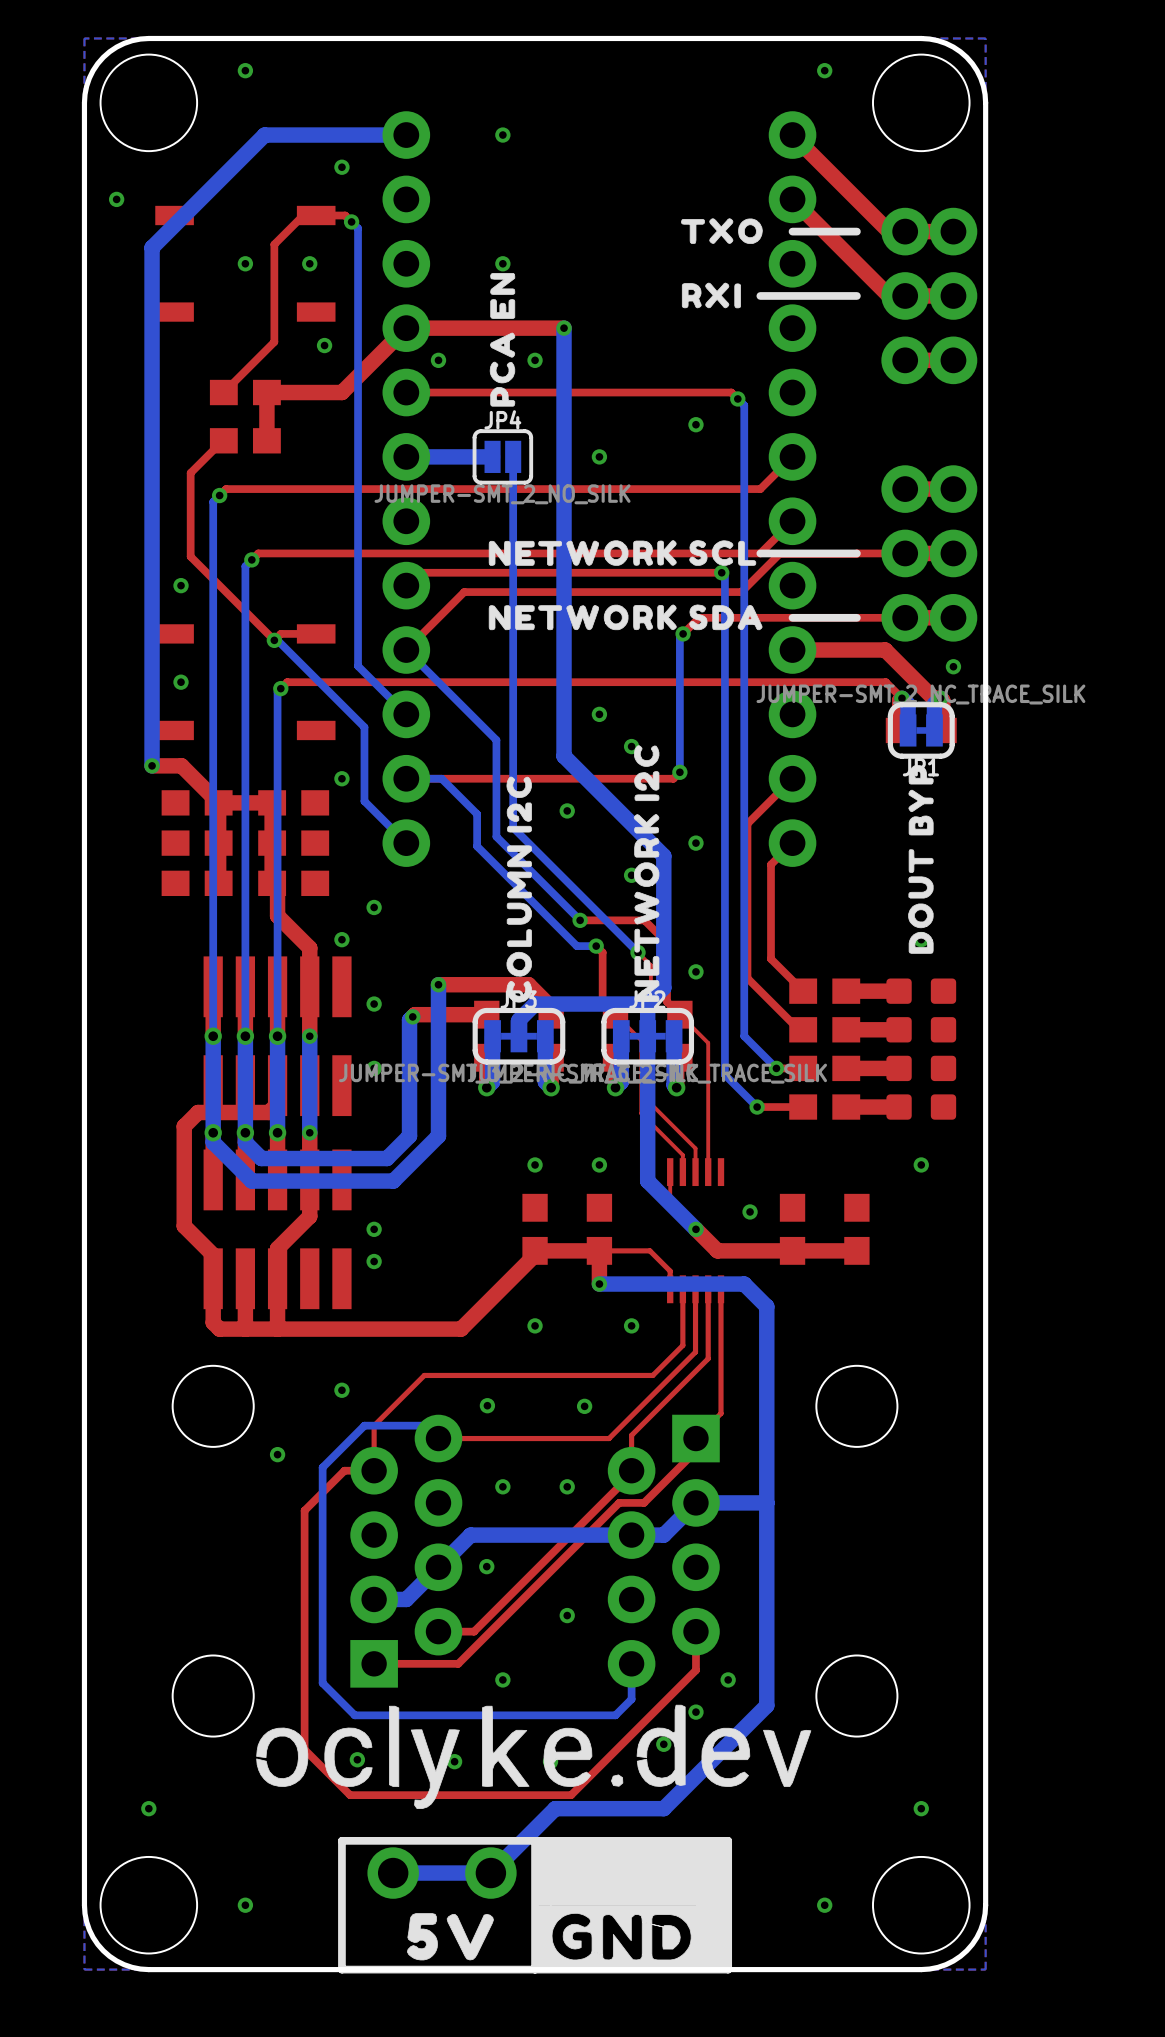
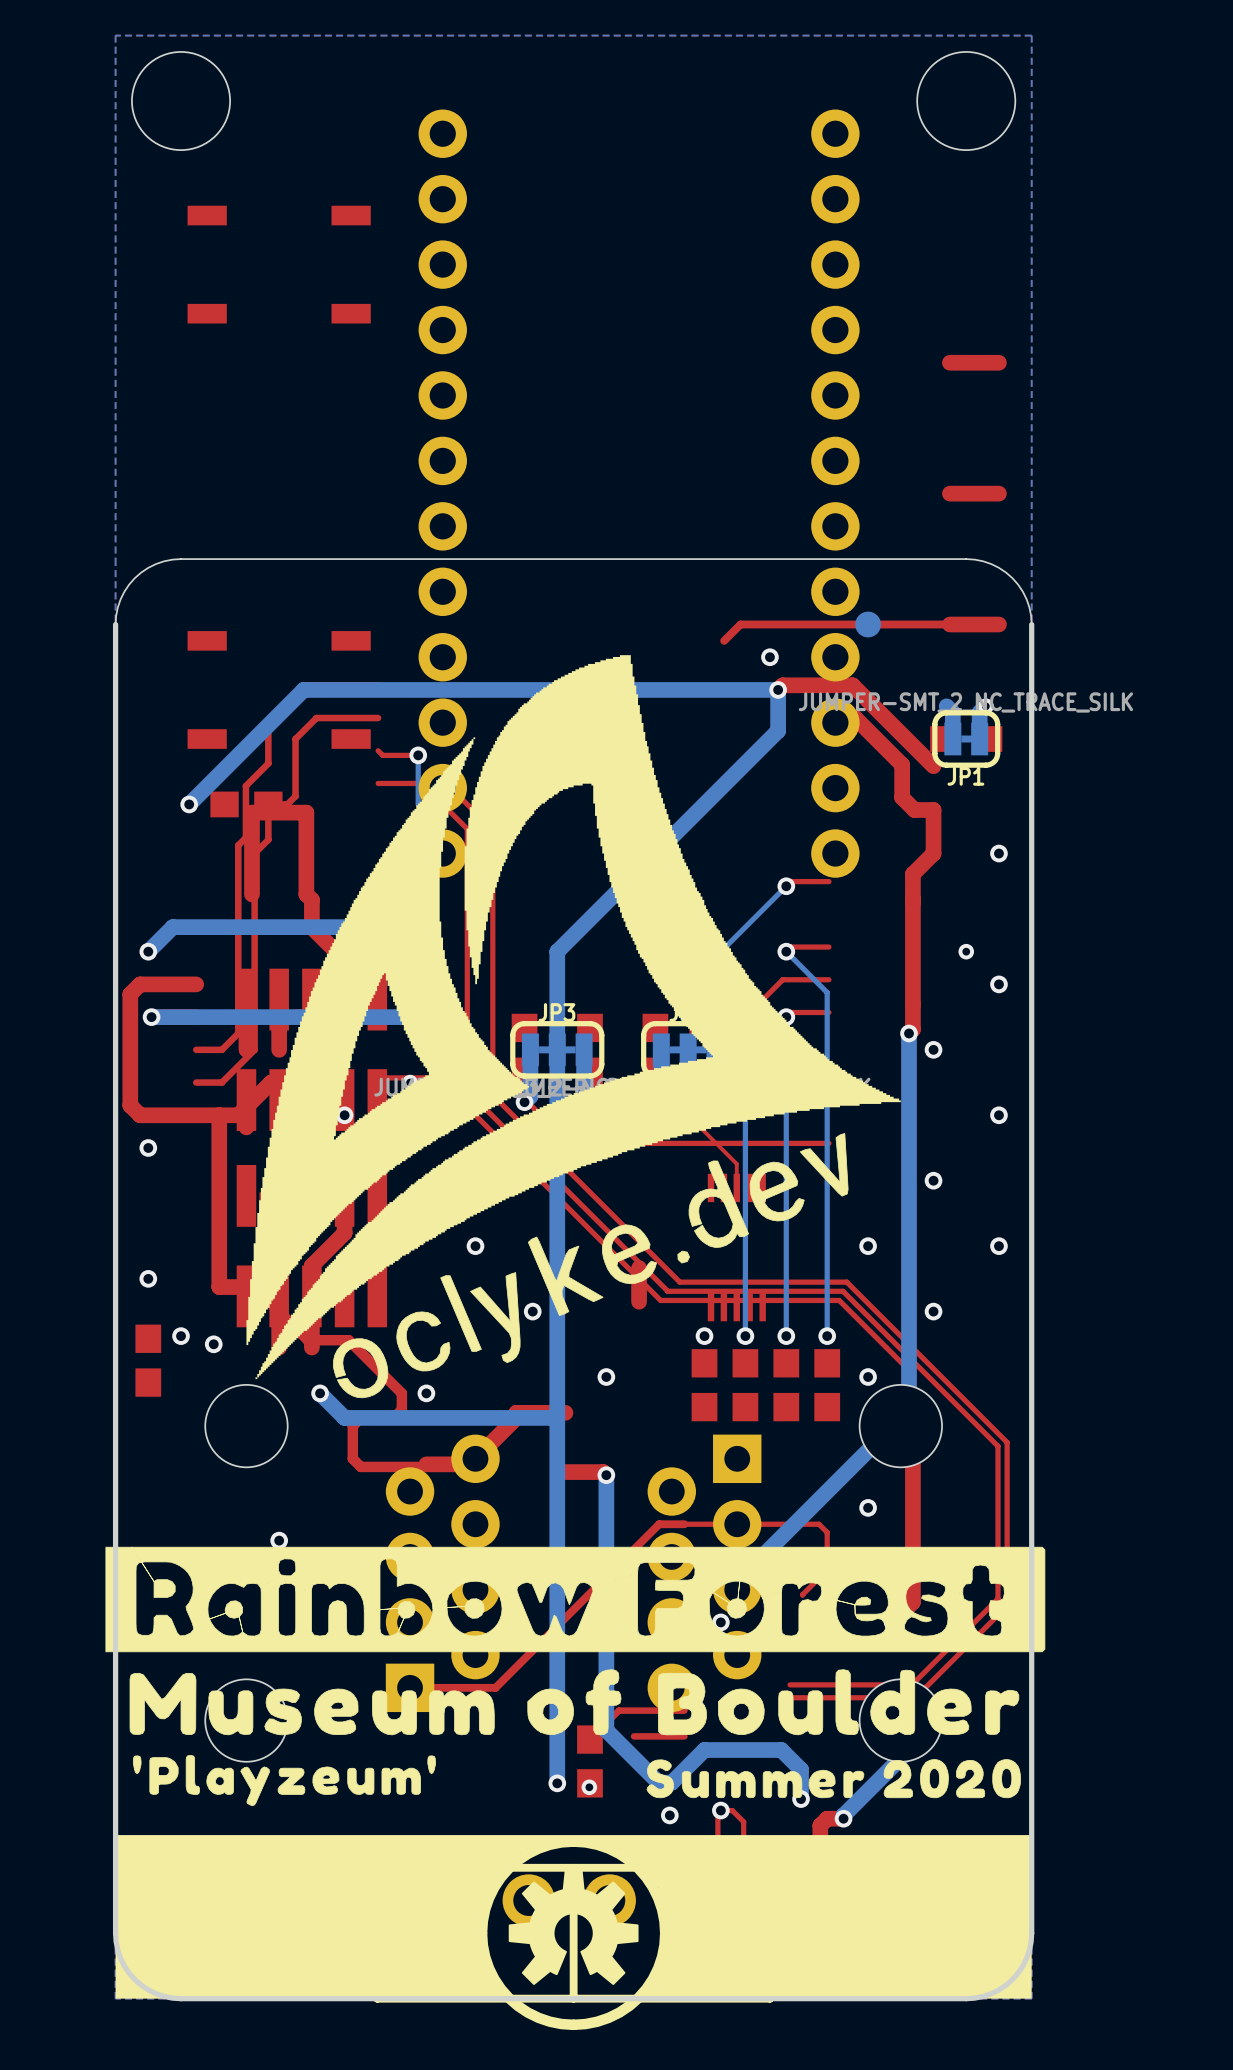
via: (245, 70) -> none
via: (824, 70) -> none
bottom track: (406, 135) (264, 135) (152, 247) (152, 765) -> none
via: (502, 135) -> none
top track: (792, 135) (889, 231) (953, 231) -> none
via: (341, 167) -> none
via: (116, 199) -> none
top track: (792, 199) (889, 295) (953, 295) -> none
drawing: [681, 218, 763, 244] -> none
top track: (351, 221) (345, 215) (303, 215) (274, 244) (274, 342) (223, 392) -> none
bottom track: (351, 221) (358, 228) (358, 666) (406, 714) -> none
via: (351, 221) -> none
line: (856, 231) (792, 231) -> none
via: (245, 263) -> none
via: (309, 263) -> none
via: (502, 263) -> none
drawing: [489, 273, 516, 407] -> none
drawing: [681, 282, 741, 309] -> none
line: (856, 295) (760, 295) -> none
part: (905, 295) -> none
part: (953, 295) -> none
top track: (564, 328) (406, 328) (341, 392) (266, 392) (266, 440) -> none
bottom track: (564, 328) (564, 756) (663, 855) (663, 955) -> (786, 886) (704, 968)
via: (564, 328) -> none
via: (324, 345) -> none
via: (438, 360) -> none
via: (535, 360) -> none
part: (245, 392) -> none
top track: (406, 392) (731, 392) (737, 398) -> none
bottom track: (737, 398) (744, 405) (744, 1036) (776, 1068) -> none
via: (737, 398) -> none
via: (695, 424) -> none
top track: (223, 440) (190, 472) (190, 556) (274, 640) (280, 633) (316, 633) -> none
part: (245, 440) -> none
bottom track: (492, 456) (406, 456) -> none
JP4: JUMPER-SMT_2_NO_SILK (502, 456) -> none
bottom track: (513, 456) (513, 827) (638, 952) -> none
via: (599, 456) -> none
top track: (792, 456) (760, 489) (226, 489) (219, 495) -> none
bottom track: (219, 495) (213, 501) (213, 1142) (251, 1181) (393, 1181) (438, 1136) (438, 984) -> none
via: (219, 495) -> none
top track: (792, 521) (760, 553) (258, 553) (251, 559) -> none
drawing: [488, 540, 757, 566] -> none
line: (856, 553) (760, 553) -> none
part: (905, 553) -> none
top track: (953, 553) (779, 554) (741, 592) (464, 592) (406, 650) -> none
part: (953, 553) -> none
bottom track: (251, 559) (245, 566) (245, 1142) (261, 1158) (387, 1158) (409, 1136) (409, 1020) (412, 1016) -> none
via: (251, 559) -> none
top track: (721, 572) (419, 572) (406, 585) -> none
bottom track: (721, 572) (724, 572) (724, 1074) (757, 1107) -> none
via: (721, 572) -> none
via: (181, 585) -> none
drawing: [488, 604, 763, 631] -> none
part: none -> (868, 624)
line: (856, 617) (792, 617) -> none
board edge: (985, 617) (985, 94) (980, 78) (966, 57) (945, 43) (921, 38) (148, 38) (132, 40) (109, 51) (97, 63) (89, 78) (84, 102) (84, 617) -> (1031, 624) (1026, 599) (1012, 578) (991, 564) (966, 559) (172, 559) (155, 564) (134, 578) (120, 599) (115, 624)
bottom track: (683, 633) (679, 637) (679, 772) -> none
via: (683, 633) -> none
bottom track: (274, 640) (277, 640) (364, 727) (364, 801) (406, 843) -> none
via: (274, 640) -> none
drawing: none -> [246, 655, 901, 1399]
bottom track: (406, 650) (496, 740) (496, 836) (580, 920) -> none
via: none -> (769, 657)
top track: (792, 650) (885, 650) (933, 698) (940, 698) (942, 700) (942, 730) -> none
via: (953, 666) -> none
top track: none -> (378, 685) (308, 685) (268, 725) (268, 763) (245, 785) (245, 837) (238, 845) (238, 1033) (221, 1049) (196, 1049)
via: (181, 682) -> none
top track: none -> (778, 689) (782, 685) (852, 685) (933, 766)
via: none -> (778, 689)
top track: (280, 688) (287, 682) (885, 682) (901, 698) (899, 700) (899, 730) -> none
bottom track: (280, 688) (277, 691) (277, 1132) -> none
via: (280, 688) -> none
via: (901, 698) -> none
top track: none -> (378, 718) (316, 718) (295, 739) (295, 796) (287, 804) (268, 804) (268, 839) (254, 853) (254, 1049) (221, 1082) (196, 1082)
top track: none -> (828, 718) (855, 718) (902, 764) (902, 797) (914, 809) (933, 809) (933, 853) (912, 874) (912, 1029) (909, 1033)
via: (599, 714) -> none
top track: none -> (378, 750) (382, 755) (418, 755)
drawing: [633, 745, 660, 1003] -> none
bottom track: none -> (418, 755) (418, 804)
via: none -> (418, 755)
via: (631, 746) -> none
drawing: [908, 764, 934, 954] -> none
top track: (152, 765) (181, 765) (218, 802) -> none
via: (152, 765) -> none
top track: (679, 772) (673, 778) (406, 778) -> none
via: (679, 772) -> none
top track: none -> (378, 783) (446, 783) (492, 829) (492, 1095) (679, 1282) (846, 1282) (1007, 1442) (1007, 1606) (915, 1697) (790, 1697)
drawing: [506, 776, 532, 1003] -> none
via: (341, 778) -> none
bottom track: (406, 778) (441, 778) (477, 814) (477, 846) (576, 946) (596, 946) -> none
top track: (792, 778) (747, 823) (747, 978) (798, 1029) (803, 1029) -> none
via: none -> (189, 804)
top track: none -> (418, 804) (442, 804) (467, 828) (467, 1090) (667, 1291) (843, 1291) (997, 1446) (997, 1598) (911, 1684) (790, 1684)
part position: (197, 802) -> (246, 804)
part: (293, 802) -> none
via: (567, 810) -> none
part: (197, 843) -> none
part: (293, 843) -> none
via: (695, 843) -> none
top track: (792, 843) (770, 864) (770, 958) (803, 991) -> none
via: none -> (998, 853)
top track: none -> (828, 881) (790, 881) (786, 886)
via: none -> (786, 886)
part: (197, 883) -> none
part: (293, 883) -> none
via: (374, 907) -> none
bottom track: none -> (344, 927) (172, 927) (148, 951)
top track: (580, 920) (644, 920) (667, 942) (667, 1001) (708, 1043) (708, 1172) -> none
via: (580, 920) -> none
top track: none -> (828, 947) (790, 947) (786, 951)
via: none -> (148, 951)
via: (341, 939) -> none
bottom track: none -> (786, 951) (827, 992) (827, 1336)
via: none -> (786, 951)
top track: (596, 946) (602, 952) (602, 1001) (641, 1040) (641, 1113) (682, 1155) (682, 1172) -> none
via: (596, 946) -> none
via: (638, 952) -> none
top track: none -> (828, 979) (782, 979) (753, 1008) (753, 1025) (786, 1058)
top track: none -> (196, 984) (140, 984) (130, 994) (130, 1105) (140, 1115) (238, 1115) (271, 1082) (328, 1082) (336, 1074) (336, 1025) (328, 1017) (296, 1017)
via: (695, 971) -> none
via: none -> (998, 984)
top track: (438, 984) (528, 984) (551, 1007) (551, 1014) -> none
via: (438, 984) -> none
part: (824, 991) -> none
top track: (899, 991) (846, 991) -> none
part: (921, 991) -> none
top track: none -> (828, 1012) (790, 1012) (786, 1017)
via: none -> (151, 1017)
bottom track: none -> (418, 1017) (151, 1017)
bottom track: none -> (786, 1017) (745, 1058) (745, 1336)
via: none -> (786, 1017)
top track: (486, 1014) (414, 1014) (412, 1016) -> none
via: (412, 1016) -> none
bottom track: (518, 1020) (535, 1004) (647, 1004) (647, 1181) (695, 1229) -> (557, 1033) (557, 951) (778, 730) (778, 689) (303, 689) (189, 804)
bottom track: none -> (909, 1033) (909, 1409) (737, 1581)
via: none -> (909, 1033)
part: (824, 1029) -> none
top track: (899, 1029) (846, 1029) -> none
part: (921, 1029) -> none
via: (213, 1036) -> none
via: (245, 1036) -> none
via: (277, 1036) -> none
bottom track: (309, 1036) (309, 1132) -> none
via: (309, 1036) -> none
bottom track: none -> (557, 1049) (557, 1417)
via: none -> (933, 1049)
bottom track: none -> (786, 1058) (786, 1336)
top track: none -> (378, 1077) (438, 1077) (660, 1300) (839, 1300) (912, 1374) (912, 1602) (892, 1622)
via: (776, 1068) -> none
part: (824, 1068) -> none
top track: (899, 1068) (846, 1068) -> none
part: (921, 1068) -> none
top track: none -> (516, 1090) (569, 1143) (828, 1143)
top track: (277, 1085) (277, 1103) (268, 1112) (198, 1112) (184, 1126) (184, 1226) (213, 1255) (213, 1322) (219, 1329) (461, 1329) (535, 1255) (535, 1250) (649, 1250) (670, 1271) (670, 1289) -> none
via: (551, 1087) -> none
via: (615, 1087) -> none
via: (676, 1087) -> none
top track: none -> (219, 1115) (219, 1287) (273, 1287) (273, 1306) (307, 1340) (348, 1340) (401, 1393) (401, 1409) (393, 1417) (360, 1417) (352, 1426) (352, 1458) (360, 1466) (469, 1464) (516, 1417) (516, 1412) (565, 1412)
via: none -> (344, 1115)
via: none -> (998, 1115)
via: (757, 1107) -> none
top track: (803, 1107) (757, 1107) -> none
part: (824, 1107) -> none
top track: (899, 1107) (846, 1107) -> none
part: (921, 1107) -> none
via: none -> (148, 1147)
via: (213, 1132) -> none
via: (245, 1132) -> none
via: (277, 1132) -> none
via: (309, 1132) -> none
via: (535, 1164) -> none
via: (599, 1164) -> none
via: none -> (933, 1180)
via: (921, 1164) -> none
top track: (670, 1172) (670, 1203) (717, 1250) (856, 1250) -> none
via: (750, 1211) -> none
via: (374, 1229) -> none
via: none -> (475, 1246)
part: (535, 1229) -> none
part: (599, 1229) -> none
via: (695, 1229) -> none
part: (792, 1229) -> none
via: none -> (868, 1246)
part: (856, 1229) -> none
via: none -> (998, 1246)
via: none -> (148, 1278)
via: (374, 1261) -> none
bottom track: (599, 1284) (744, 1284) (766, 1306) (766, 1705) (663, 1808) (555, 1808) (490, 1873) (393, 1873) -> none
via: (599, 1284) -> none
top track: (682, 1289) (682, 1345) (652, 1375) (424, 1375) (374, 1425) (374, 1470) (344, 1470) (304, 1510) (304, 1749) (350, 1795) (571, 1795) (695, 1670) (695, 1631) -> none
top track: (695, 1289) (695, 1352) (609, 1438) (438, 1438) -> none
top track: (708, 1289) (708, 1358) (631, 1435) (631, 1474) (474, 1631) (438, 1631) -> none
top track: (721, 1289) (721, 1413) (695, 1438) (695, 1450) (644, 1502) -> (802, 1595) (827, 1570) (827, 1532) (819, 1524) (684, 1524)
via: none -> (532, 1311)
via: none -> (933, 1311)
via: none -> (181, 1336)
via: none -> (704, 1336)
via: none -> (745, 1336)
via: none -> (786, 1336)
via: none -> (827, 1336)
via: none -> (213, 1344)
via: (535, 1325) -> none
via: (631, 1325) -> none
part: none -> (148, 1360)
via: none -> (606, 1377)
via: none -> (868, 1377)
part: none -> (704, 1385)
part: none -> (745, 1385)
part: none -> (786, 1385)
part: none -> (827, 1385)
bottom track: none -> (320, 1393) (344, 1417) (557, 1417)
via: none -> (320, 1393)
via: none -> (426, 1393)
via: (341, 1390) -> none
bottom track: none -> (557, 1417) (557, 1783)
via: (487, 1405) -> none
via: (584, 1406) -> none
bottom track: (438, 1438) (425, 1425) (364, 1425) (322, 1467) (322, 1683) (354, 1715) (615, 1715) (631, 1699) (631, 1663) -> none
top track: none -> (565, 1472) (603, 1472) (606, 1475)
via: (277, 1454) -> none
bottom track: none -> (606, 1475) (606, 1730) (658, 1782) (671, 1782) (704, 1750) (781, 1750) (801, 1769) (801, 1799)
via: none -> (606, 1475)
via: (502, 1486) -> none
via: (567, 1486) -> none
via: none -> (868, 1507)
bottom track: (766, 1502) (695, 1502) (663, 1535) (470, 1535) (406, 1599) (374, 1599) -> none
via: none -> (279, 1540)
drawing: none -> [105, 1546, 1046, 1999]
via: (486, 1566) -> none
via: none -> (720, 1622)
via: (567, 1615) -> none
via: (502, 1679) -> none
via: (728, 1679) -> none
top track: none -> (684, 1710) (618, 1710) (590, 1739)
drawing: [256, 1704, 812, 1809] -> none
top track: none -> (684, 1736) (634, 1736)
via: (695, 1712) -> none
bottom track: none -> (917, 1741) (843, 1815) (843, 1818)
part: none -> (590, 1761)
via: (663, 1744) -> none
via: none -> (557, 1783)
via: (357, 1759) -> none
via: (454, 1761) -> none
via: none -> (801, 1799)
via: none -> (720, 1810)
via: none -> (669, 1815)
top track: none -> (843, 1818) (827, 1818) (820, 1825) (820, 1843)
via: none -> (843, 1818)
via: (148, 1808) -> none
via: (921, 1808) -> none
line: none -> (573, 1841) (561, 1842) (538, 1848) (517, 1860) (508, 1868) (500, 1877) (489, 1898) (482, 1921) (482, 1933) (482, 1945) (489, 1968) (500, 1988) (508, 1998) (517, 2005) (538, 2017) (561, 2024) (573, 2024) (585, 2024) (608, 2017) (629, 2005) (638, 1998) (646, 1988) (658, 1968) (664, 1945) (665, 1933) (664, 1921) (658, 1898) (646, 1877) (638, 1868) (629, 1860) (608, 1848) (585, 1842) (573, 1841)
top track: none -> (743, 1843) (743, 1821) (732, 1810) (720, 1810) (717, 1813) (717, 1843)
drawing: [534, 1840, 729, 1970] -> none
via: (245, 1905) -> none
via: (824, 1905) -> none
drawing: [406, 1913, 494, 1961] -> none

